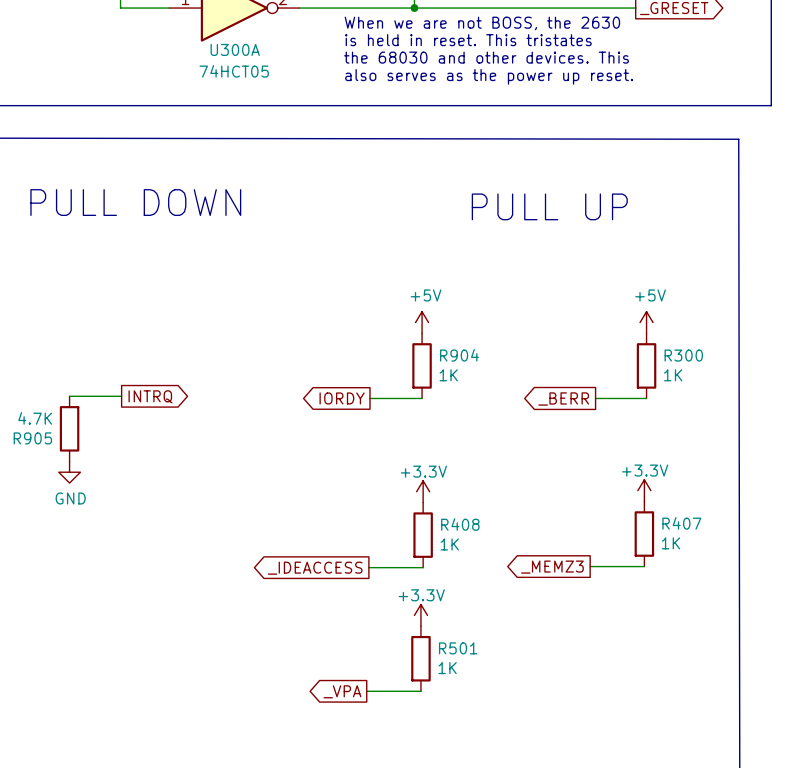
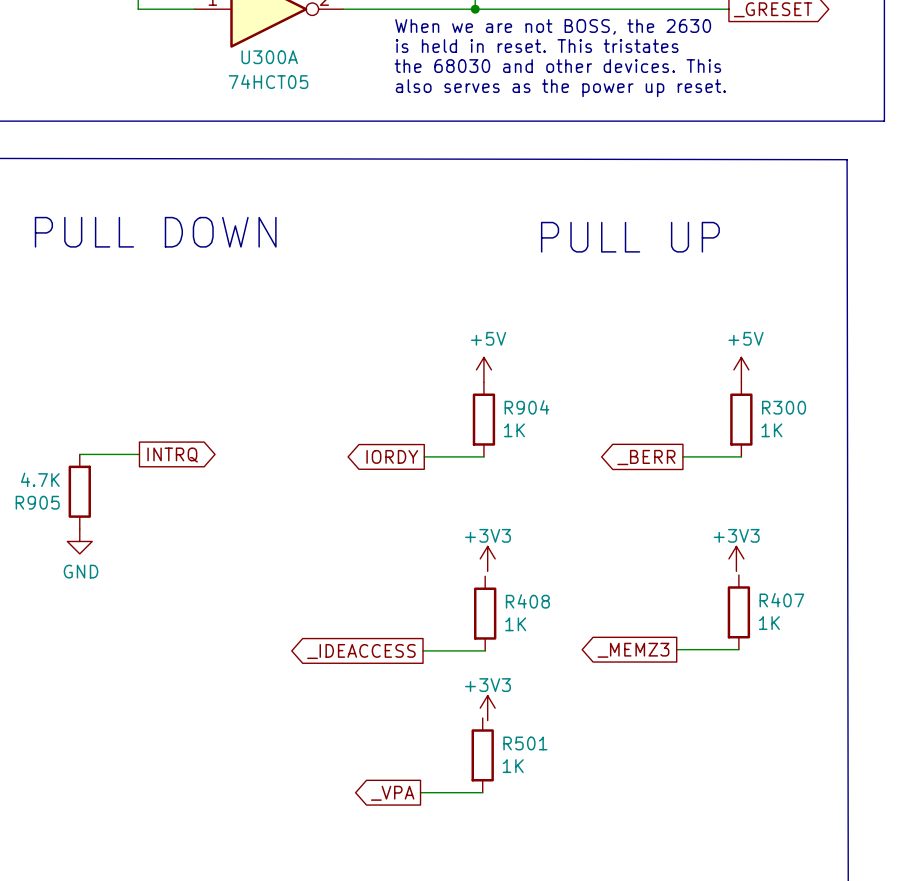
power symbol: +3.3V (644, 490) -> +3V3 (736, 558)
power symbol: +3.3V (423, 491) -> +3V3 (487, 558)
power symbol: +3.3V (420, 615) -> +3V3 (487, 708)

